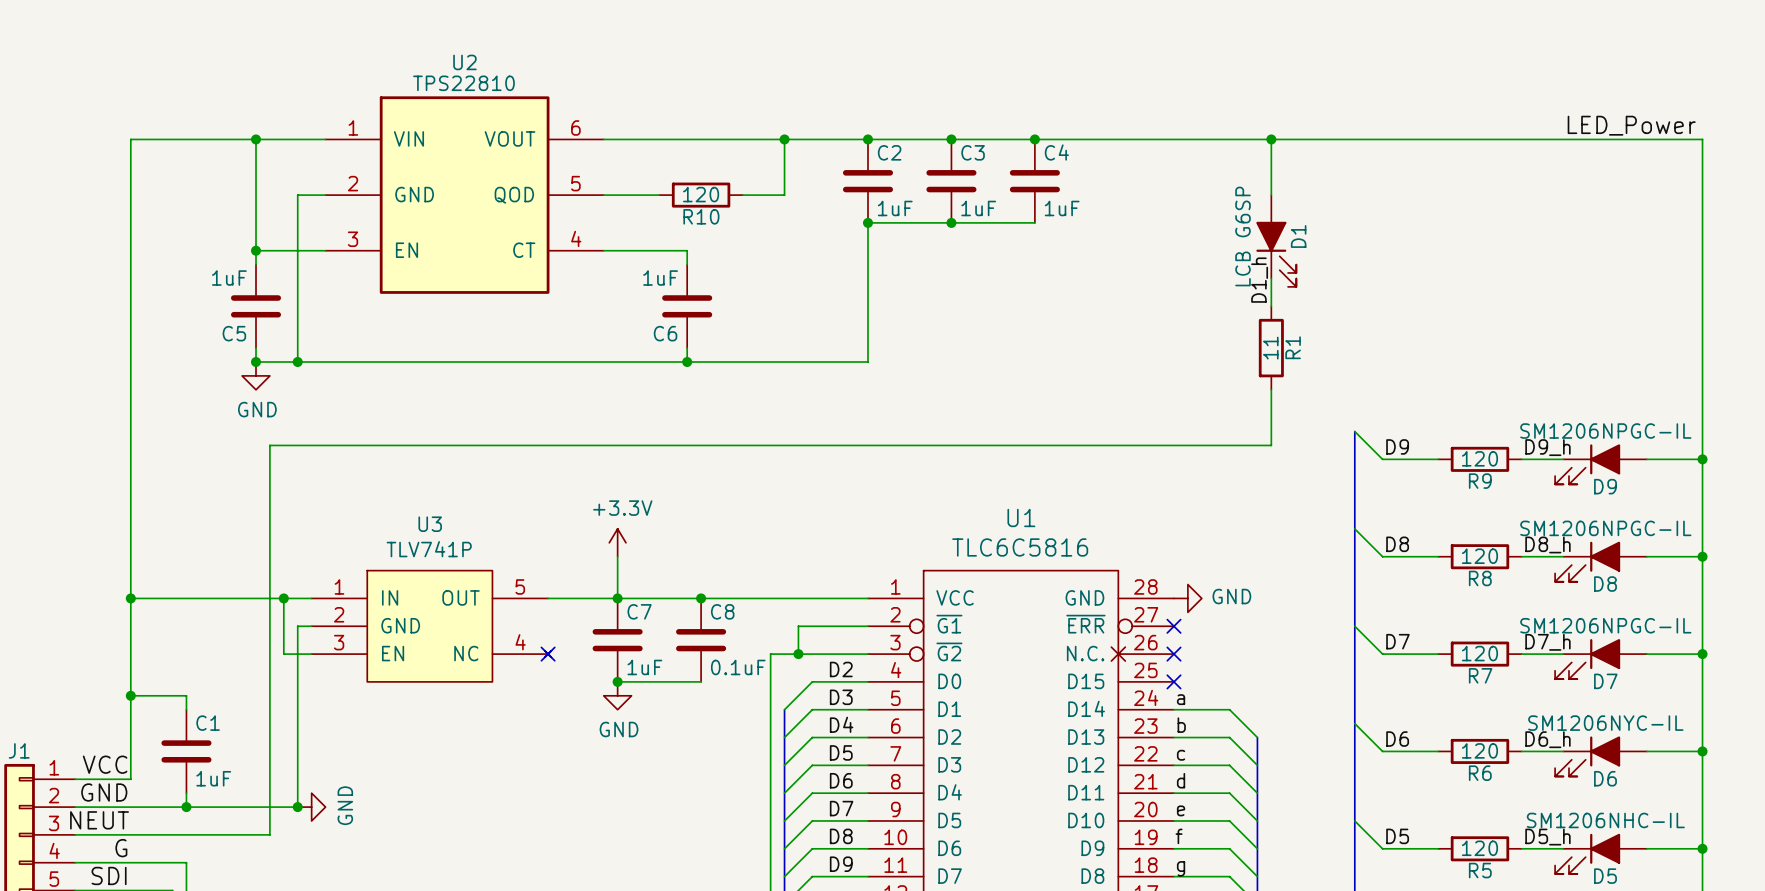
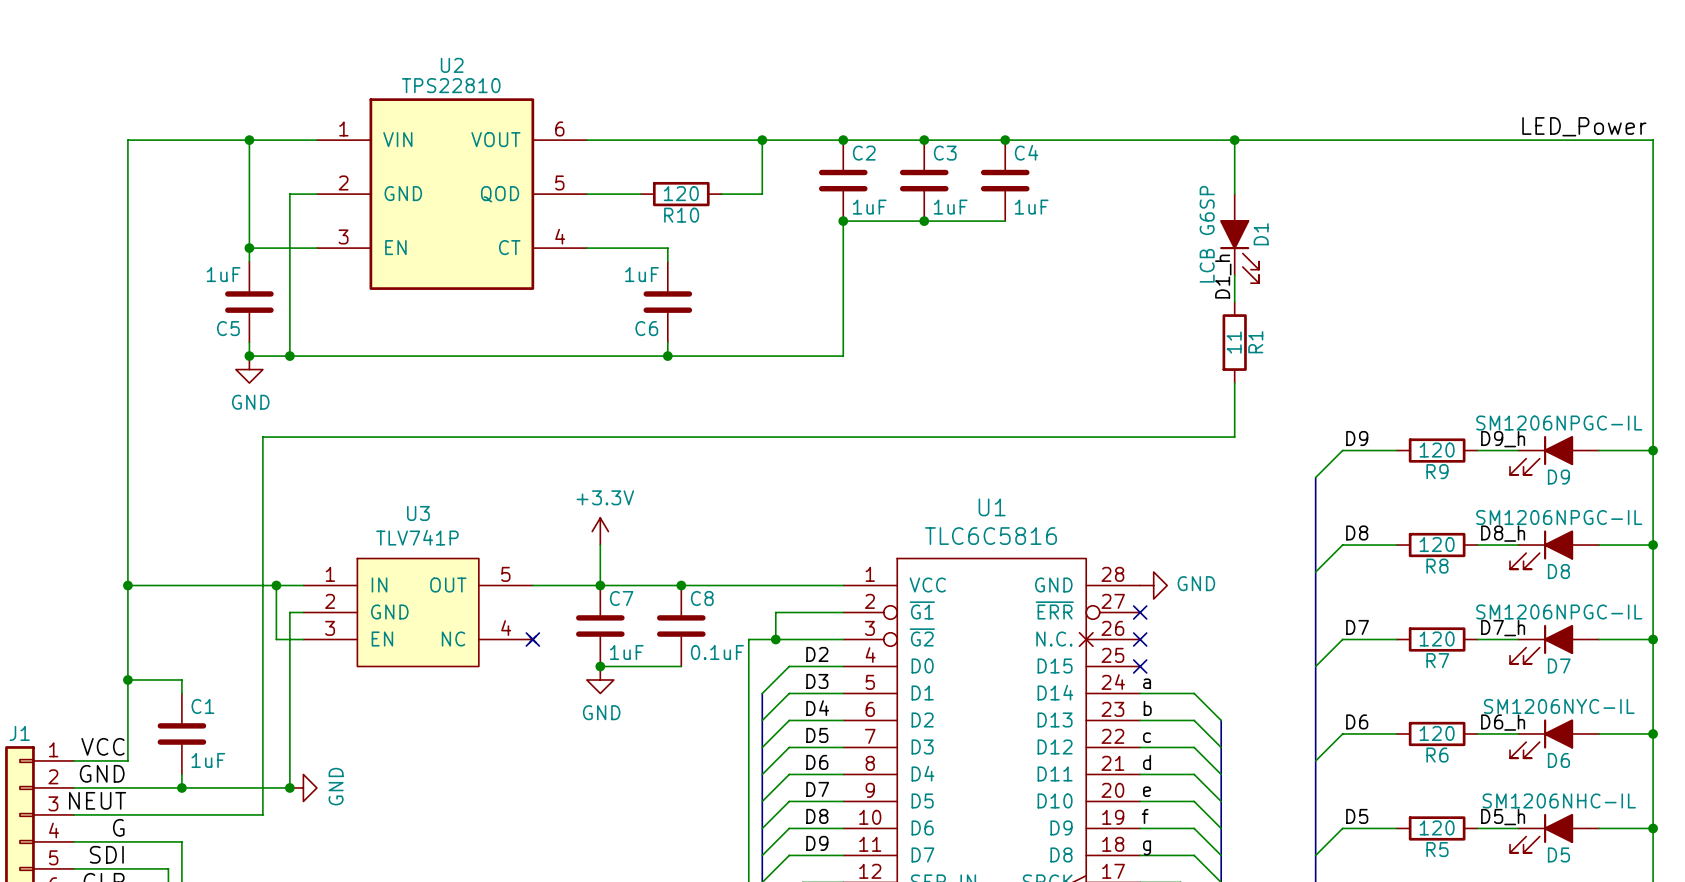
wire: (1354, 431) (1382, 459) -> (1315, 477) (1342, 450)
bus: (1354, 431) (1354, 487) -> none
wire: (1354, 528) (1382, 556) -> (1315, 572) (1342, 545)
wire: (1354, 626) (1382, 654) -> (1315, 666) (1342, 639)
wire: (1354, 723) (1382, 751) -> (1315, 760) (1342, 733)
wire: (1354, 820) (1382, 848) -> (1315, 855) (1342, 828)

